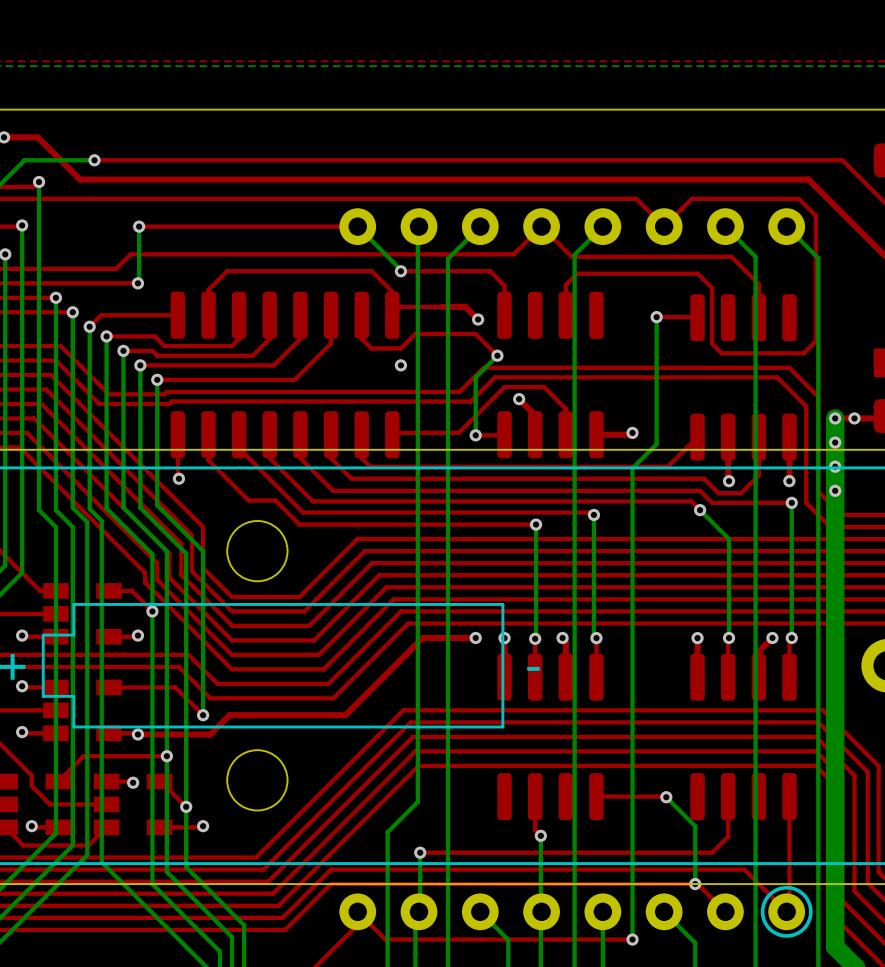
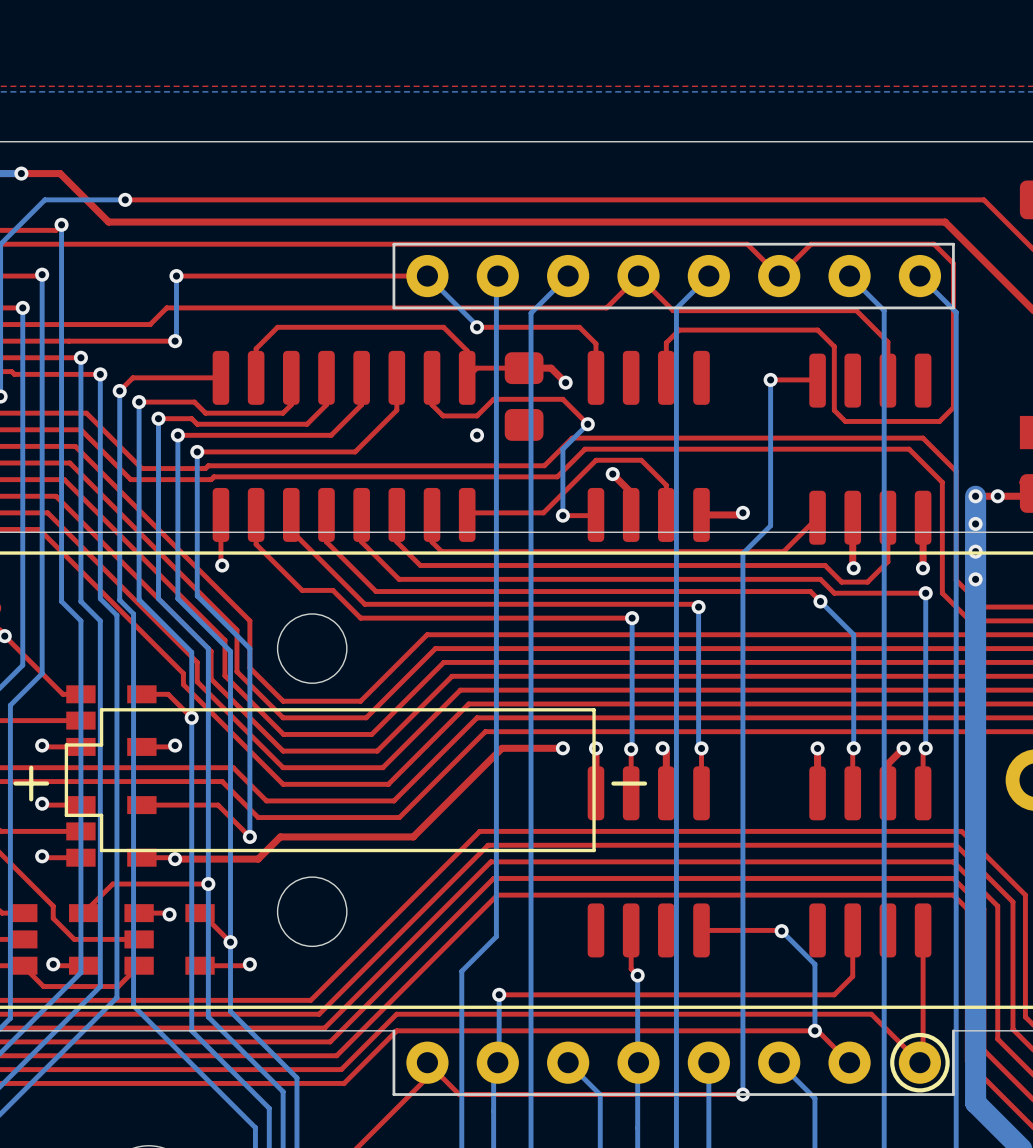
board edge: none -> (953, 244) (953, 307) (393, 307) (393, 244) (953, 244)
part: none -> (524, 396)
board edge: (815, 884) (328, 884) -> (953, 1030) (953, 1094) (393, 1094) (393, 1030)

